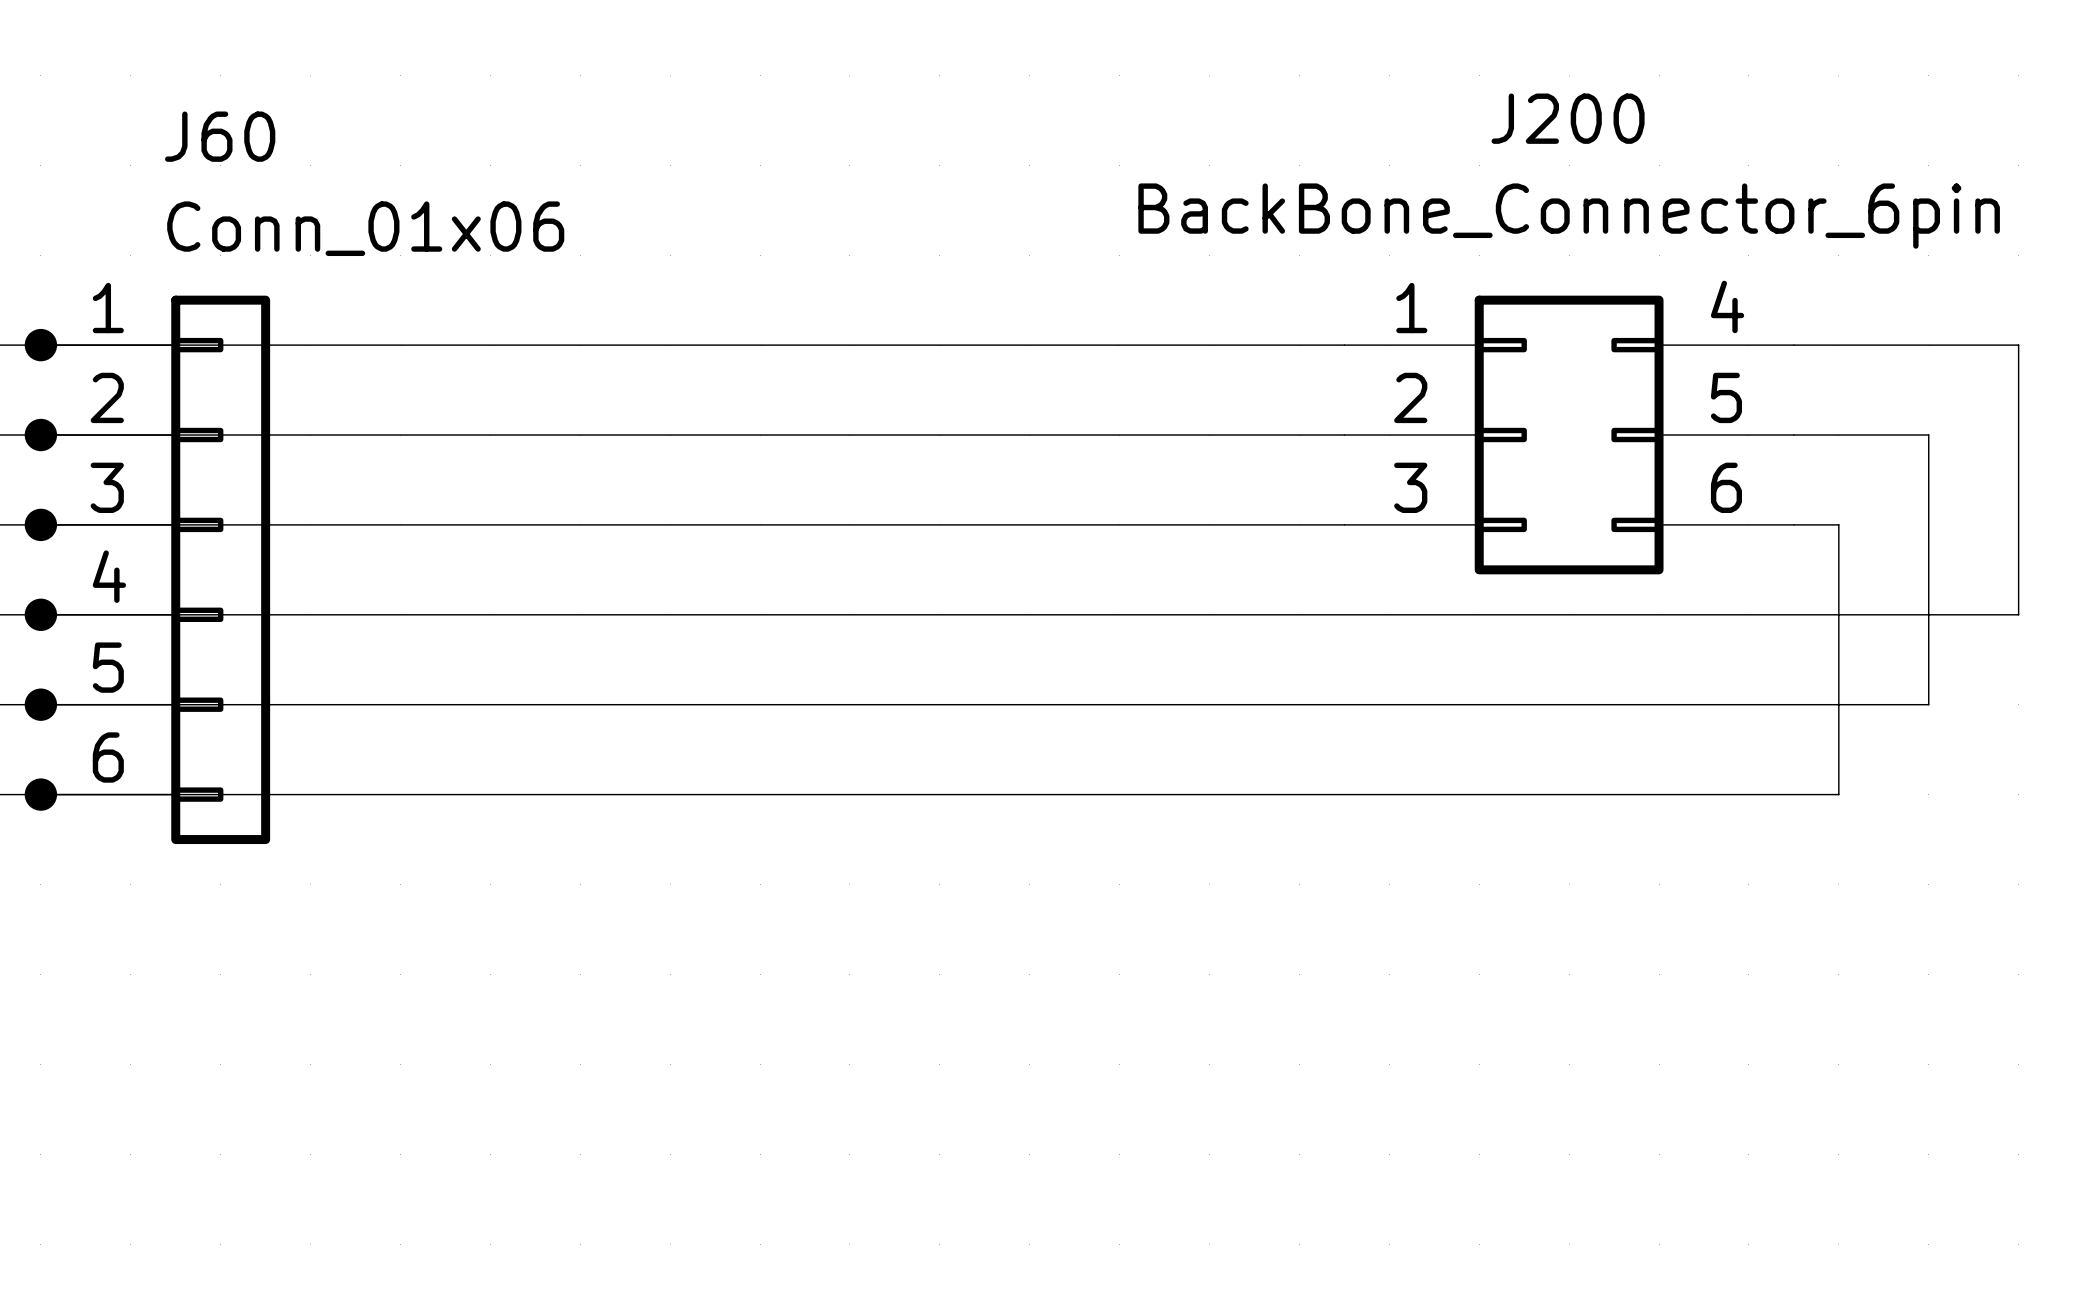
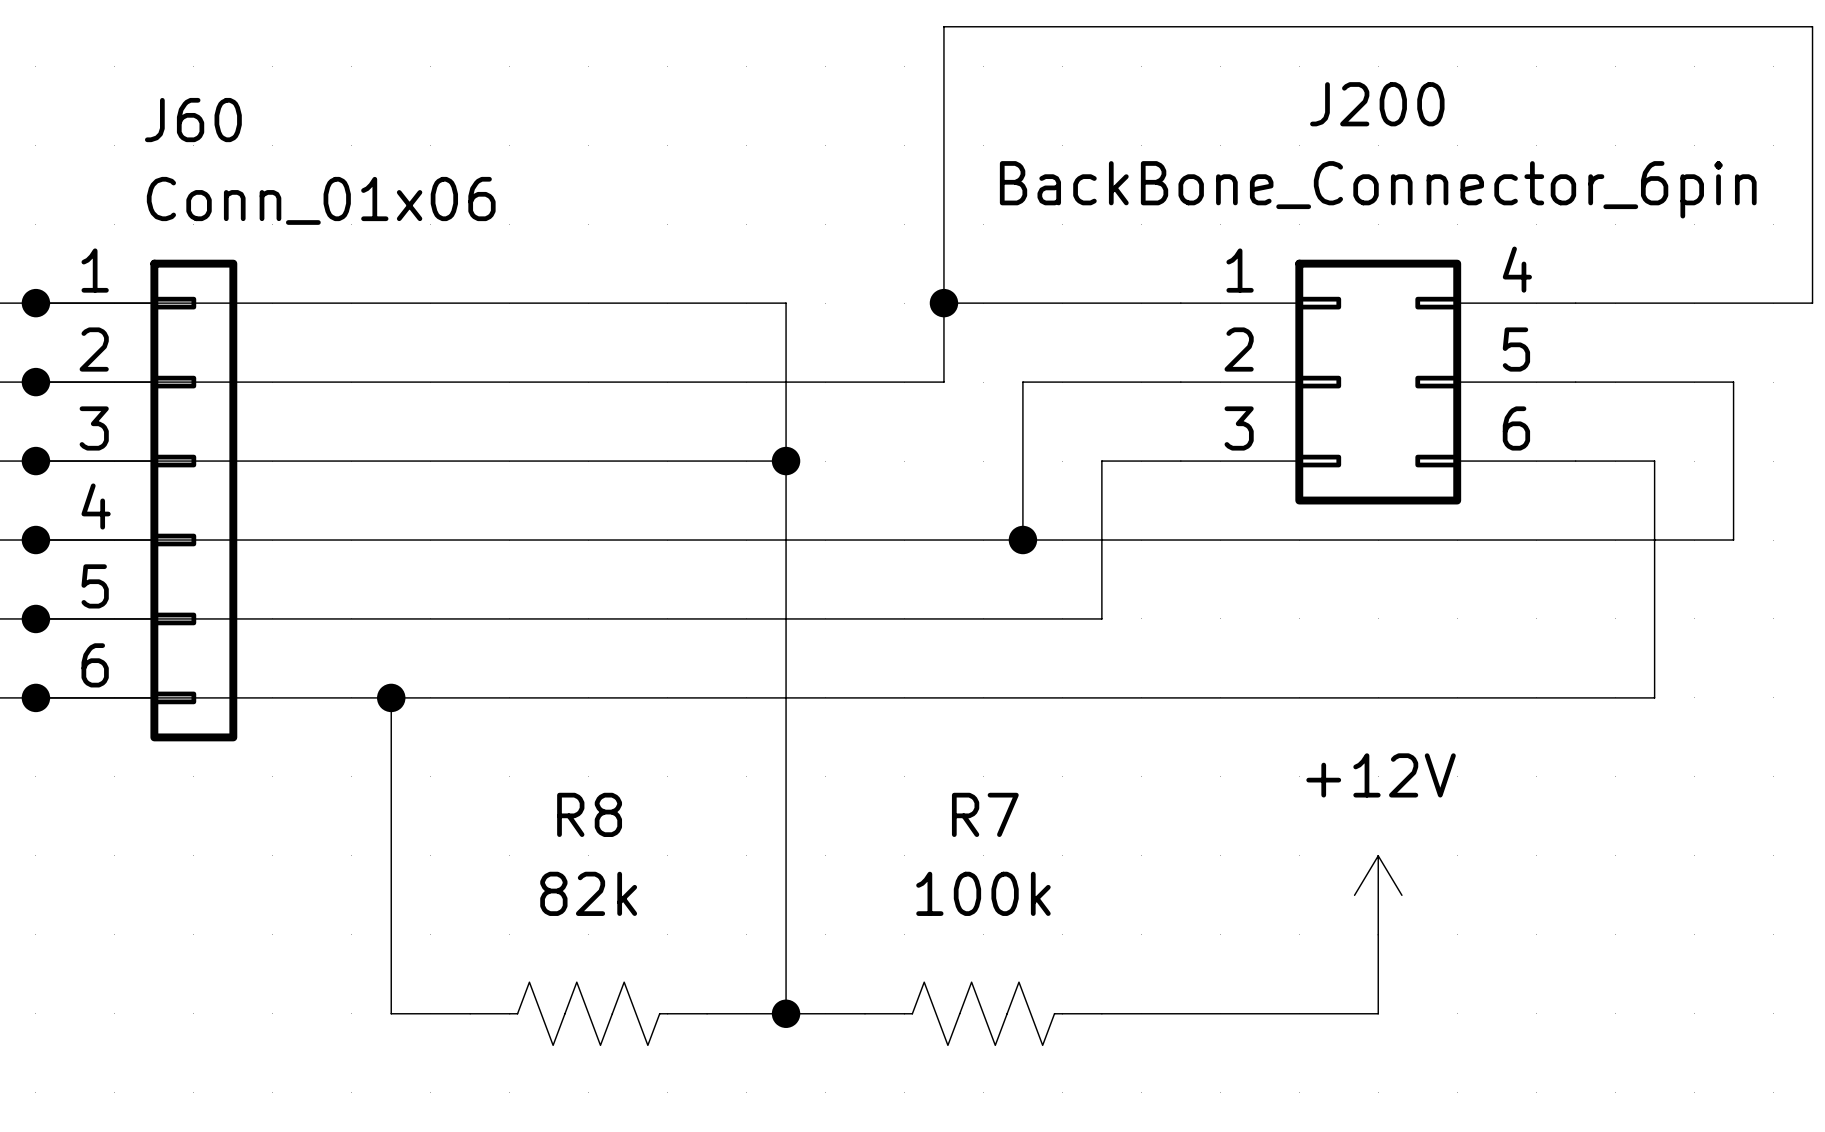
wire: (894, 345) (1074, 345) -> (786, 303) (786, 1013)
junction: none -> (943, 303)
wire: (2018, 345) (2018, 614) (1973, 614) -> (1694, 382) (1733, 382) (1733, 540)
wire: none -> (1773, 303) (1812, 303) (1812, 26) (943, 26) (943, 382)
wire: (1074, 435) (1164, 435) -> (1022, 540) (1022, 382)
wire: (1928, 435) (1928, 704) (1254, 704) -> none
wire: (894, 524) (1254, 524) -> (1101, 618) (1101, 461)
junction: none -> (786, 461)
wire: (1838, 524) (1838, 794) -> (1615, 461) (1654, 461) (1654, 697) (1615, 697)
junction: none -> (1022, 540)
wire: none -> (391, 697) (391, 1013) (470, 1013)
junction: none -> (391, 697)
power symbol: none -> +12V (1378, 895)
wire: none -> (1378, 934) (1378, 1013) (1101, 1013)
R8: none -> 82k (588, 1013)
wire: none -> (707, 1013) (865, 1013)
junction: none -> (786, 1013)
R7: none -> 100k (983, 1013)

